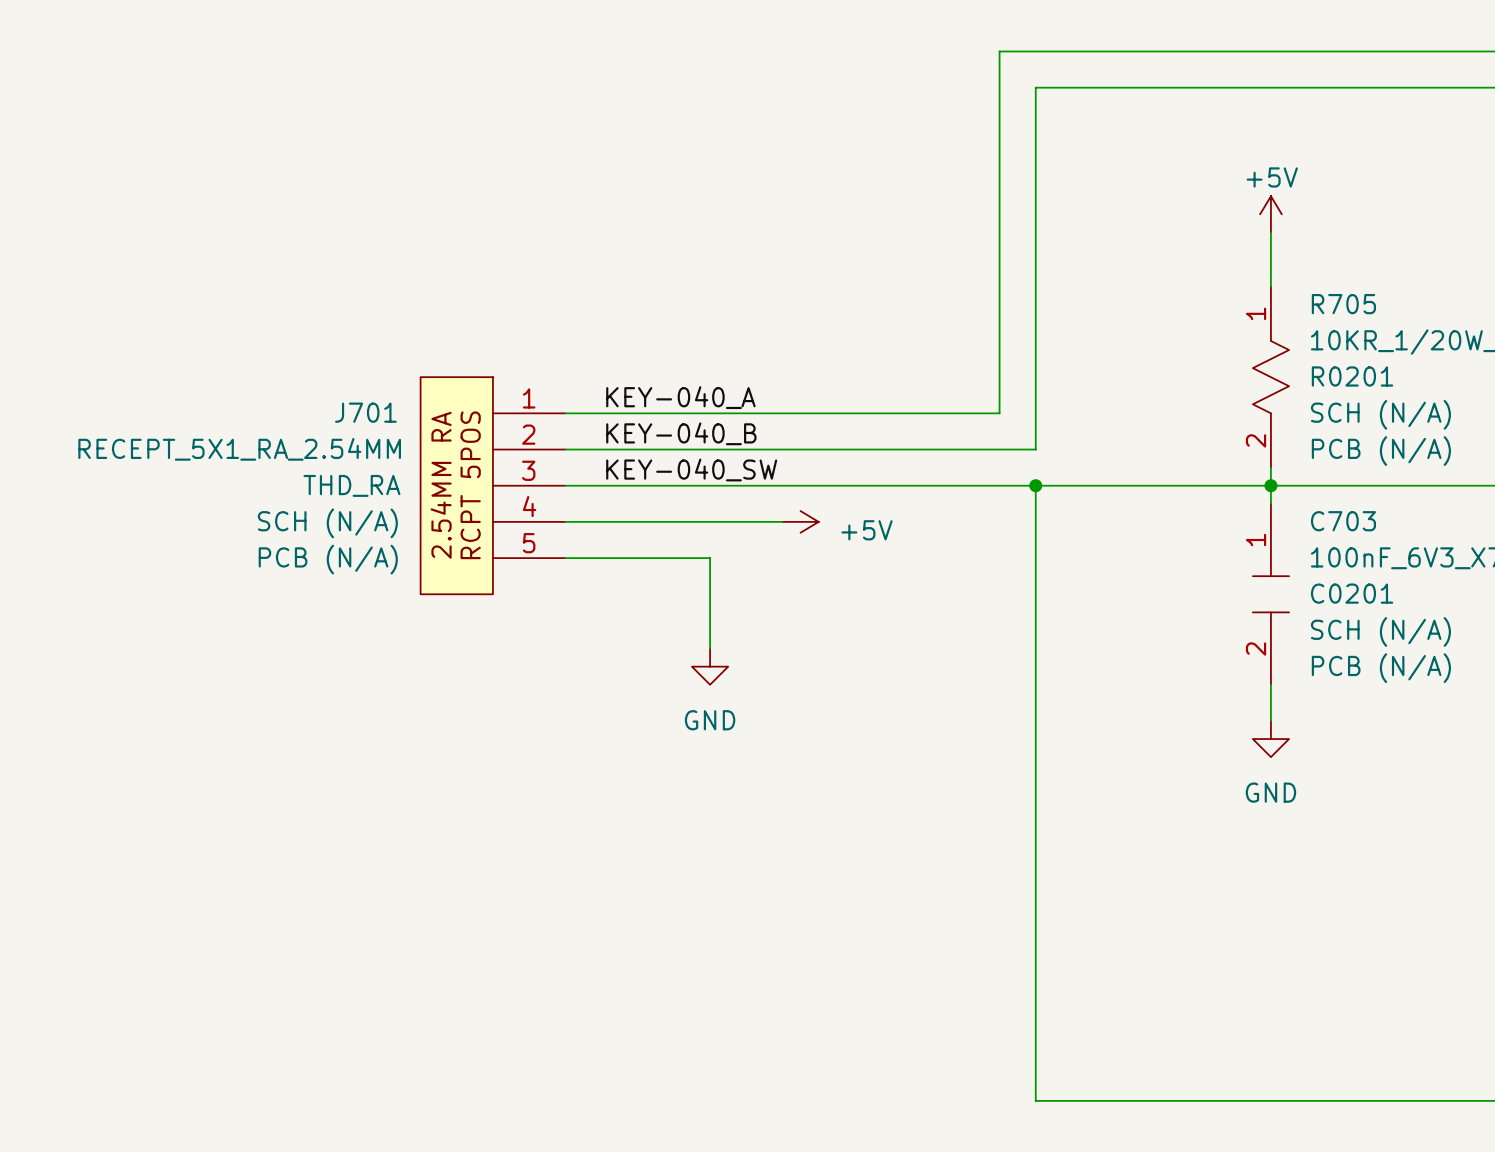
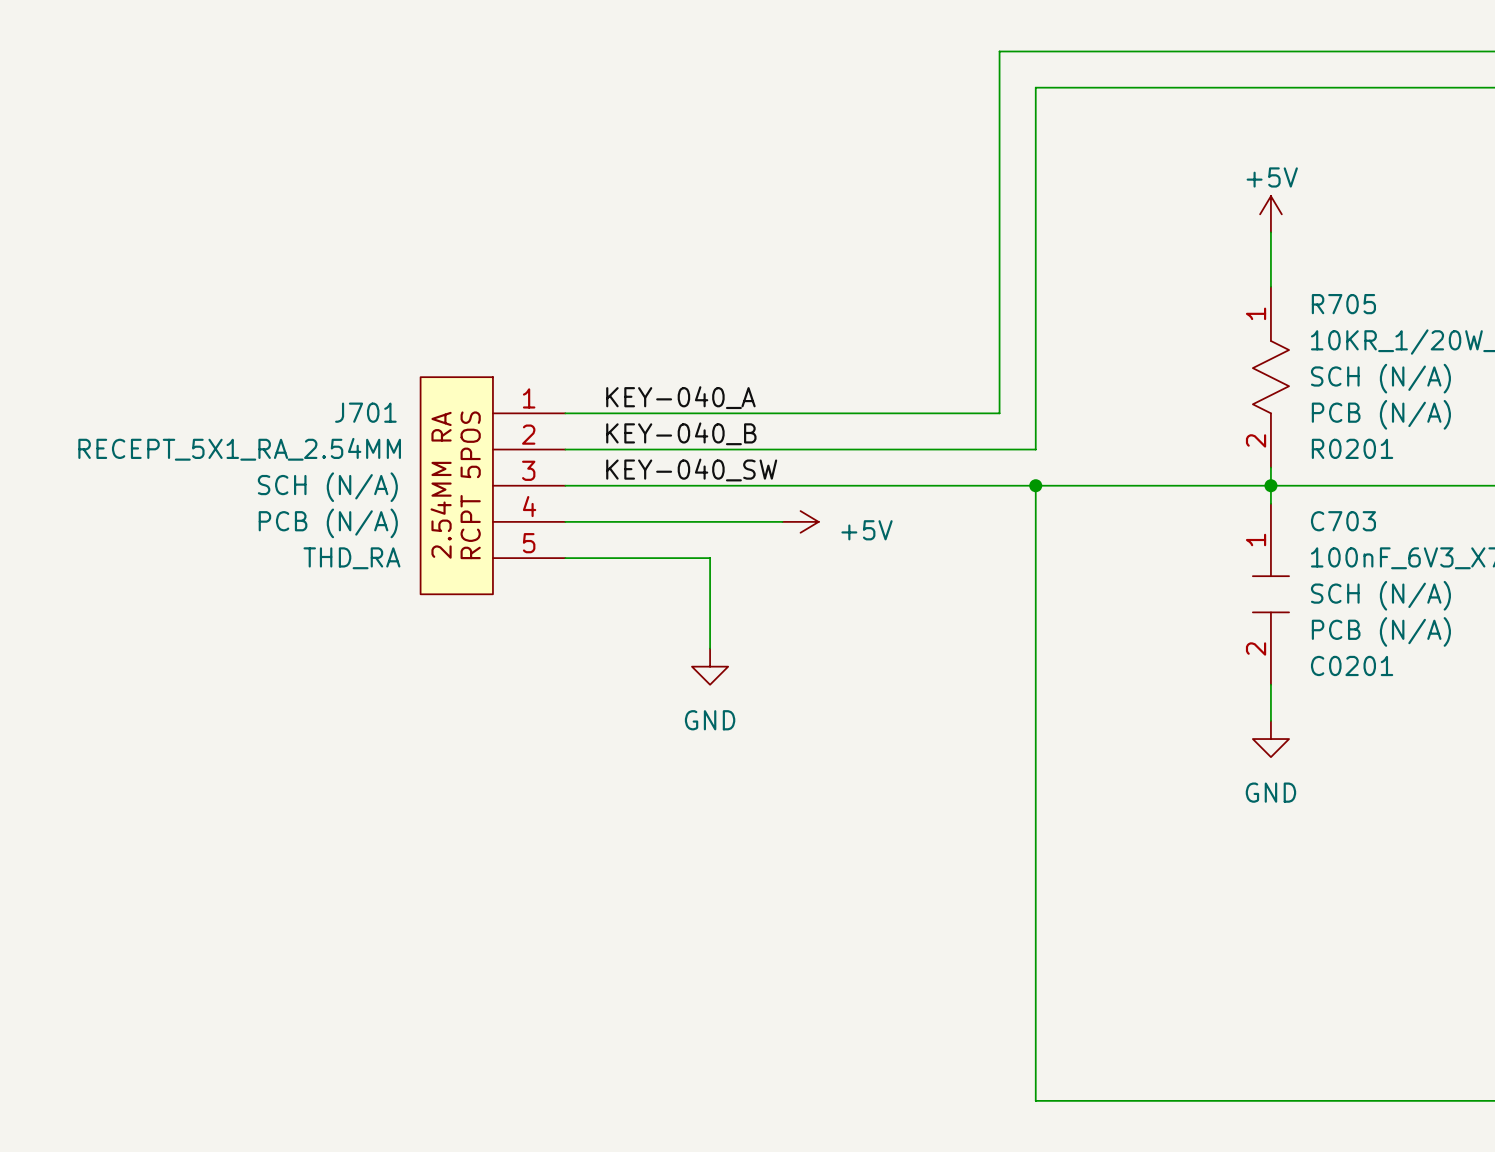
R705 text position: R0201 (1352, 376) -> R0201 (1352, 448)
R705 text position: SCH (N/A) (1380, 414) -> SCH (N/A) (1380, 378)
R705 text position: PCB (N/A) (1381, 451) -> PCB (N/A) (1381, 414)
J701 text position: THD_RA (351, 485) -> THD_RA (351, 558)
J701 text position: SCH (N/A) (327, 523) -> SCH (N/A) (327, 487)
J701 text position: PCB (N/A) (328, 559) -> PCB (N/A) (328, 523)
C703 text position: C0201 (1352, 593) -> C0201 (1352, 665)
C703 text position: SCH (N/A) (1380, 631) -> SCH (N/A) (1380, 595)
C703 text position: PCB (N/A) (1381, 668) -> PCB (N/A) (1381, 631)

